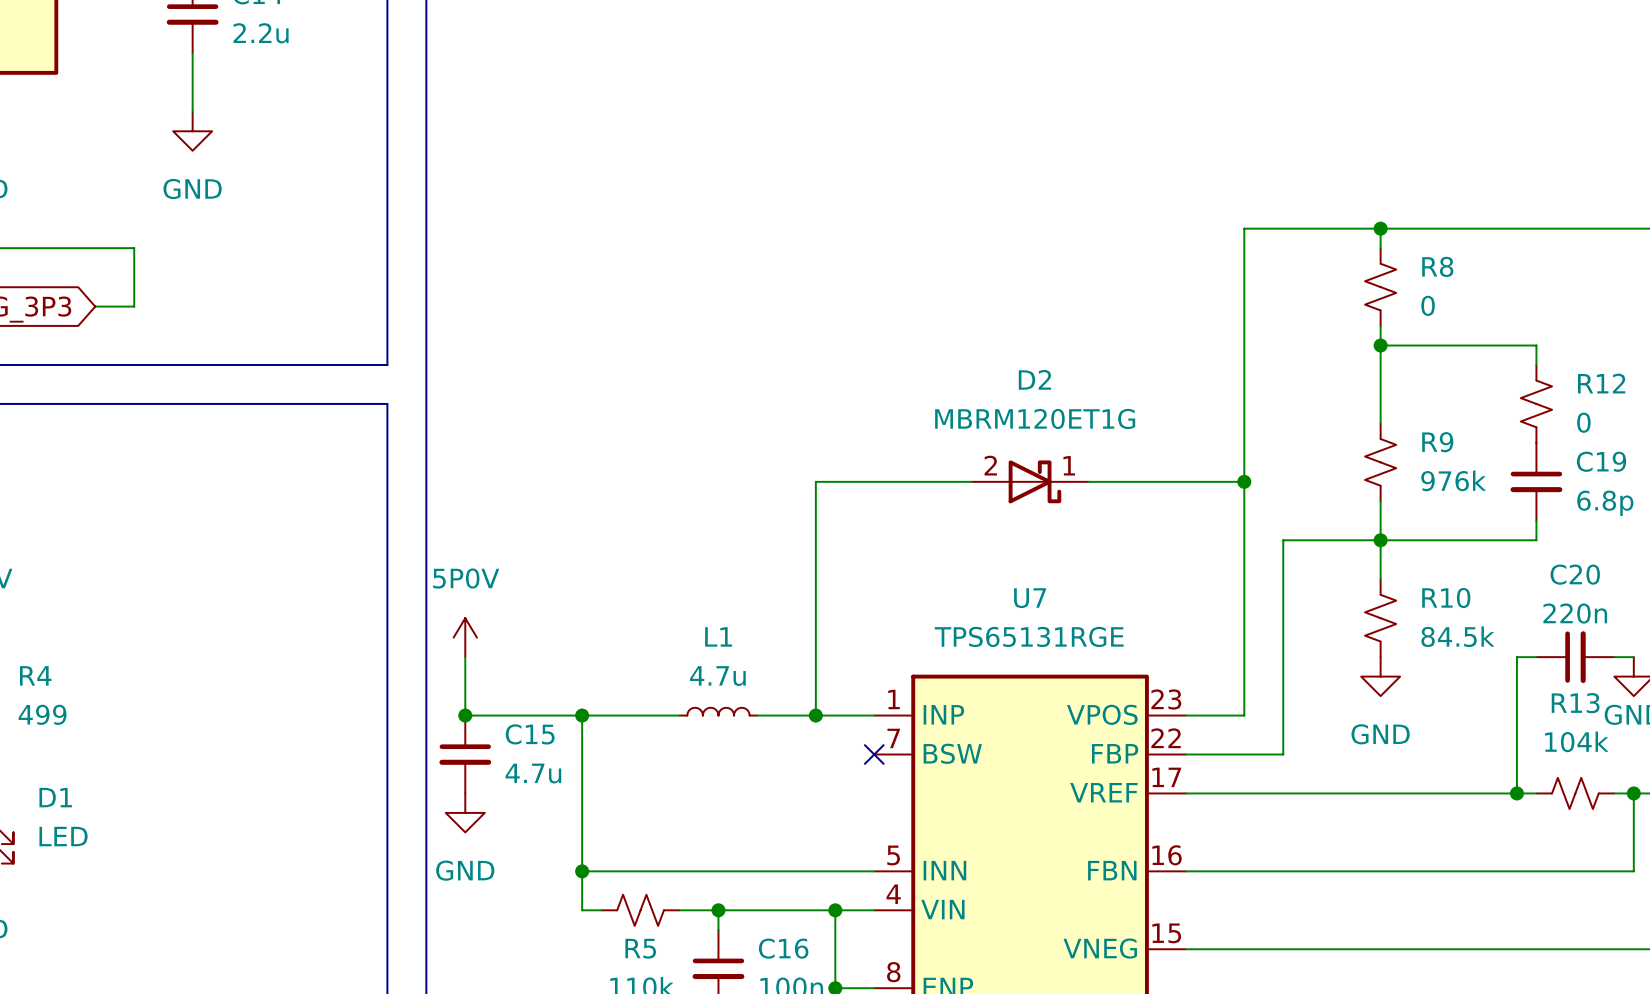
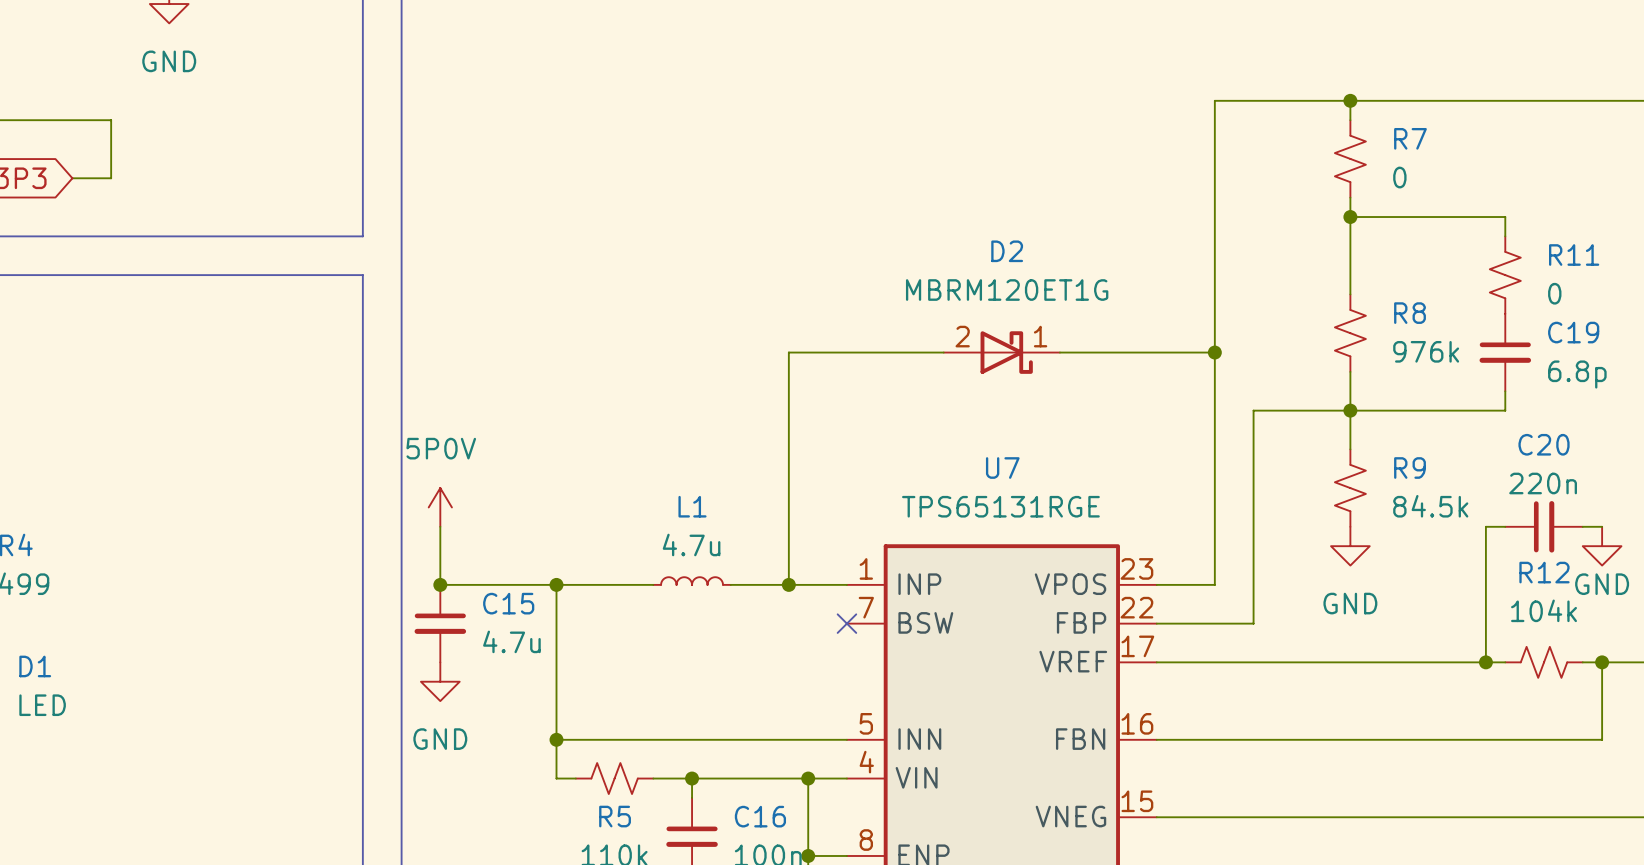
R8 name: R8 (1437, 266) -> R7 (1410, 138)
R12 name: R12 (1601, 383) -> R11 (1574, 255)
R9 name: R9 (1437, 442) -> R8 (1410, 313)
R10 name: R10 (1446, 597) -> R9 (1410, 468)
R13 name: R13 (1575, 703) -> R12 (1544, 572)

